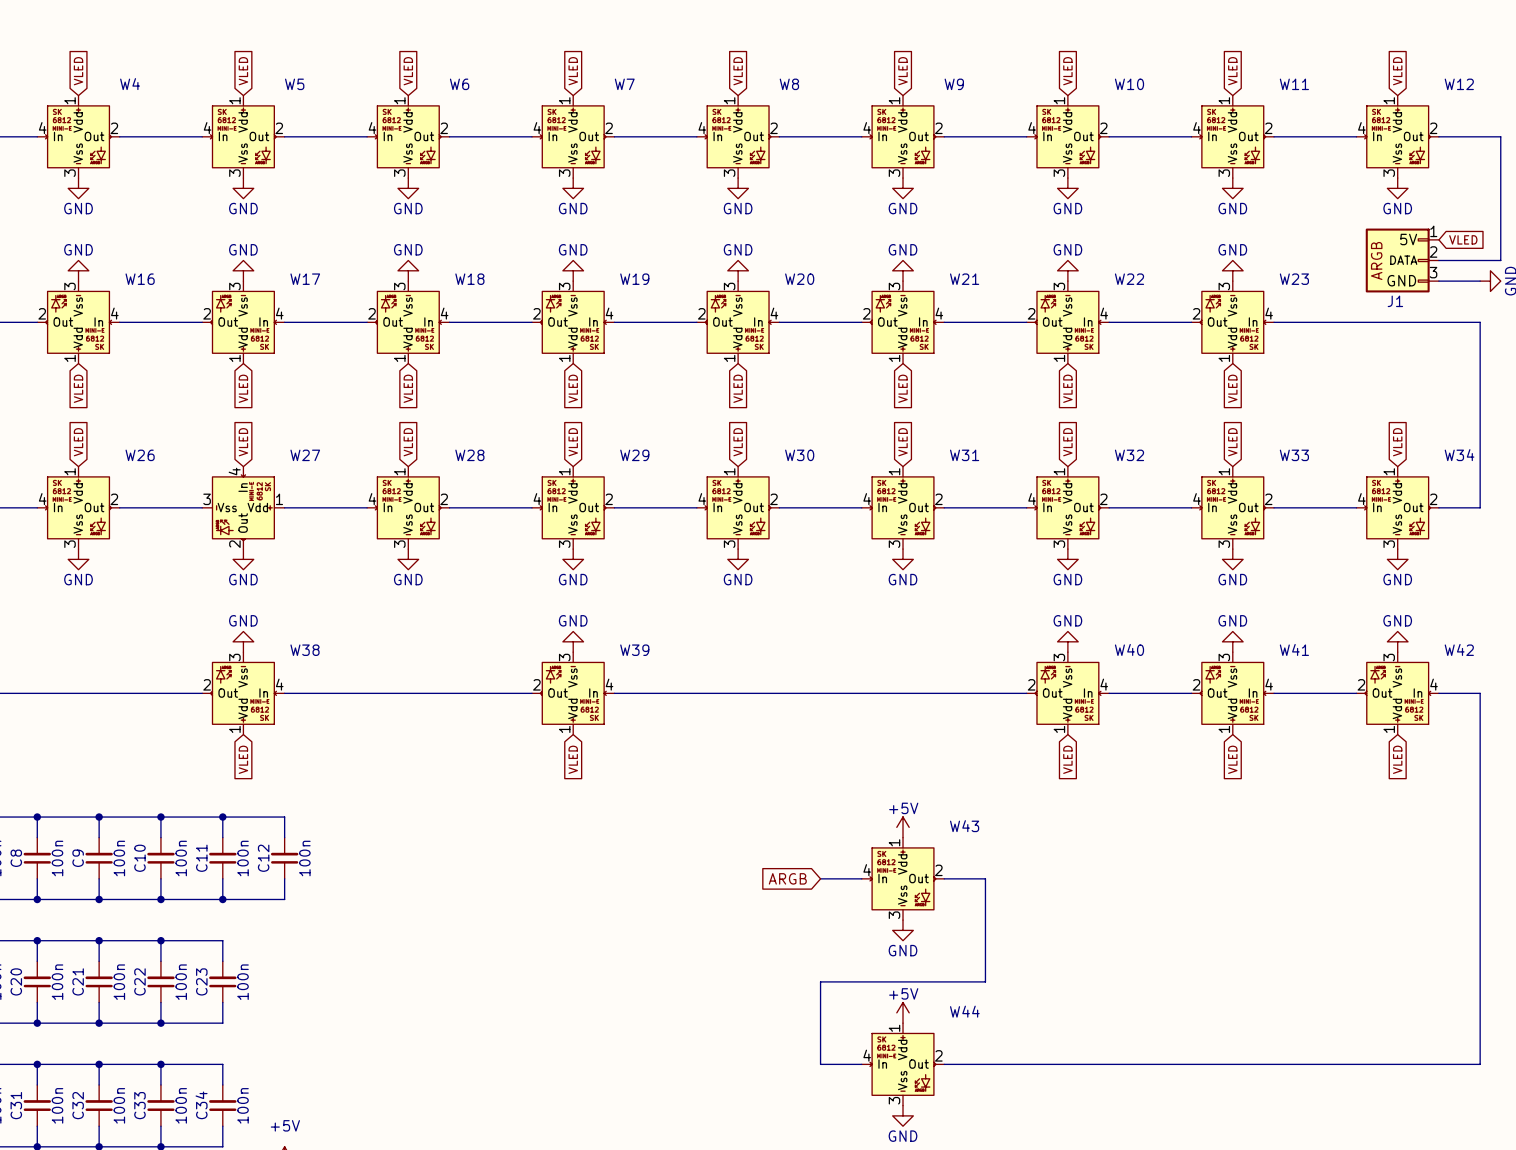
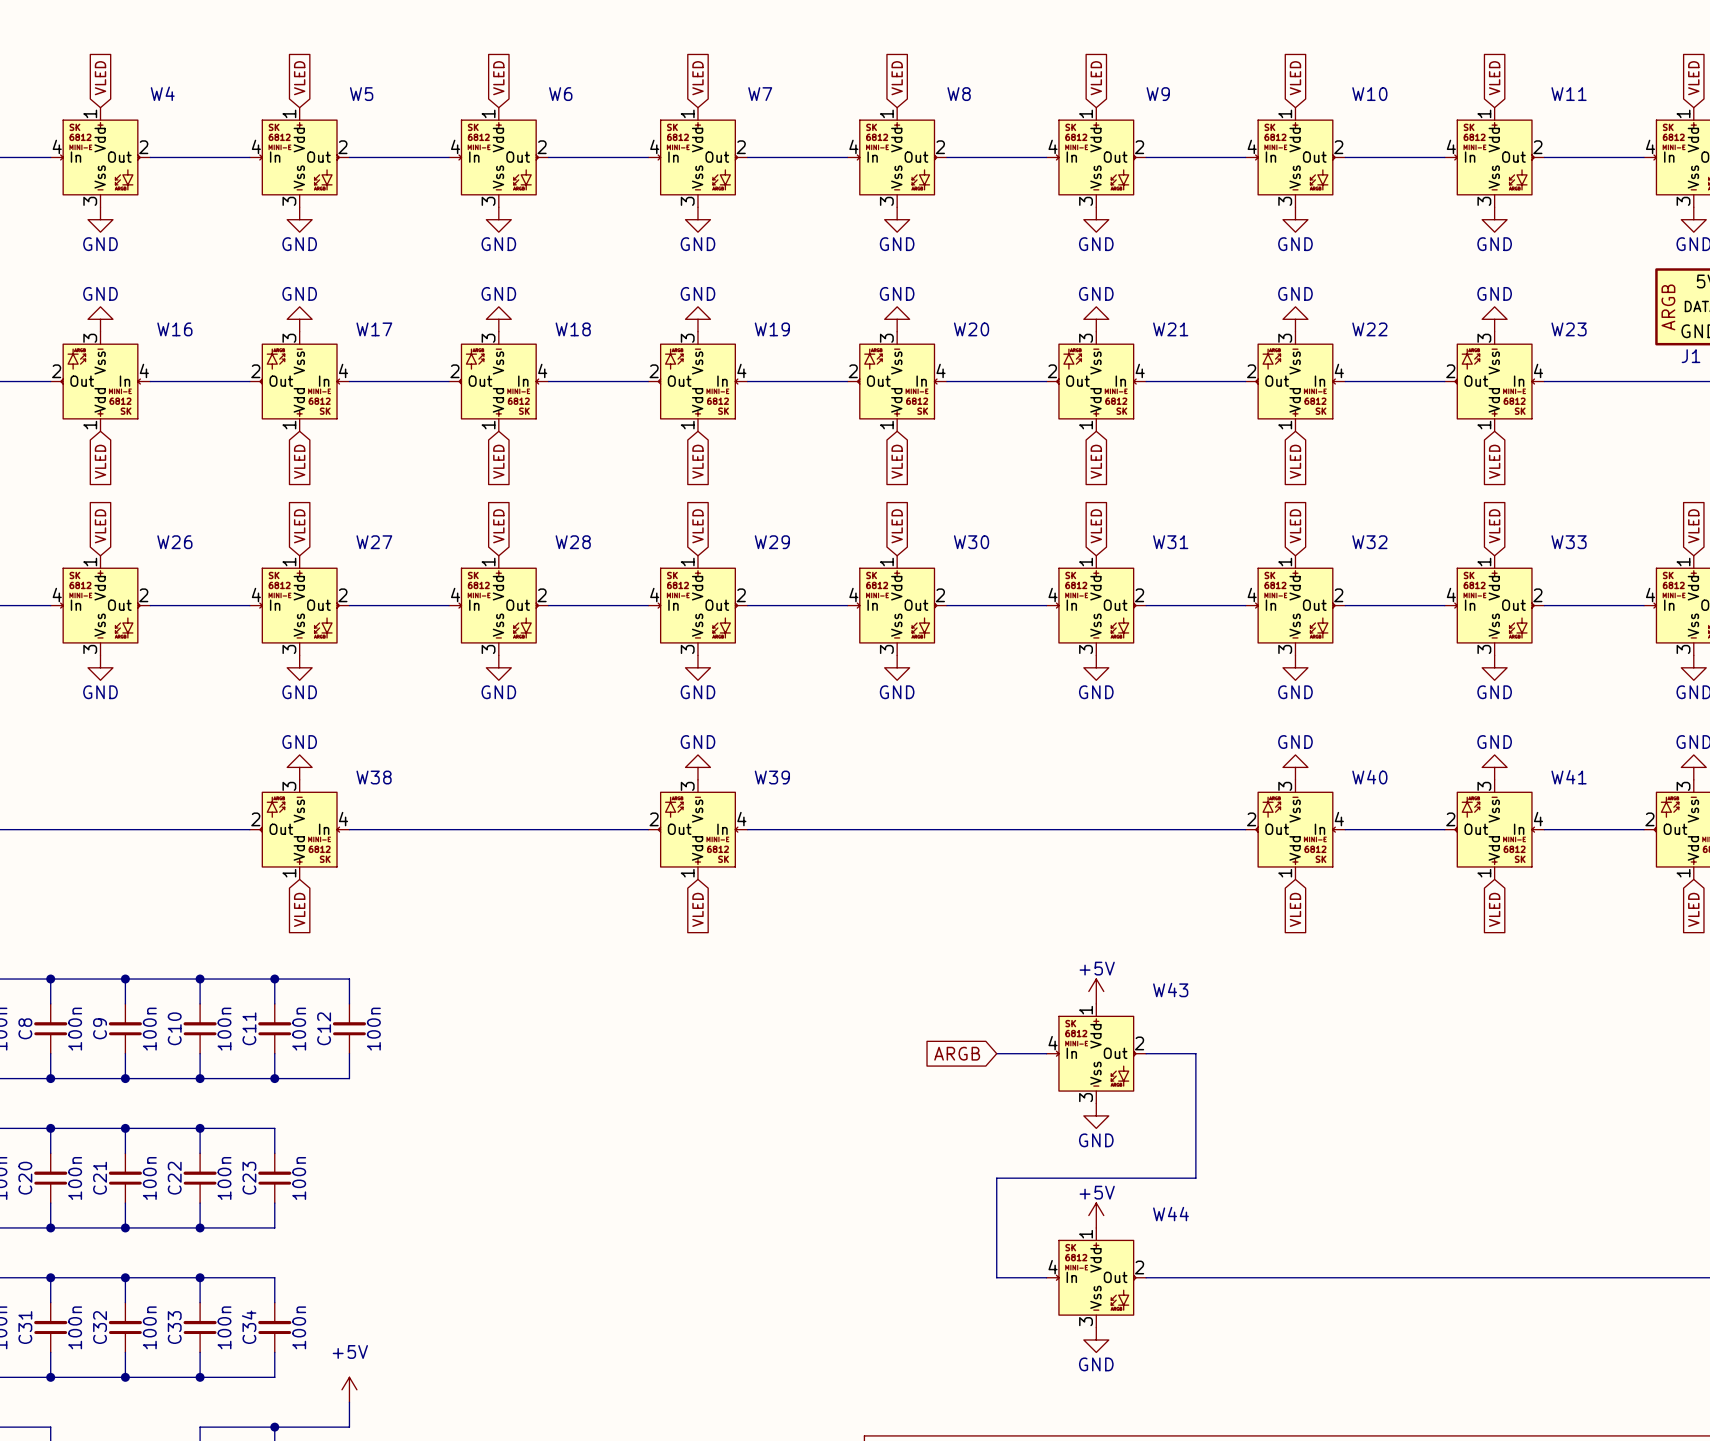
W27 rotation: 0° (243, 507) -> 90° counterclockwise (299, 605)

